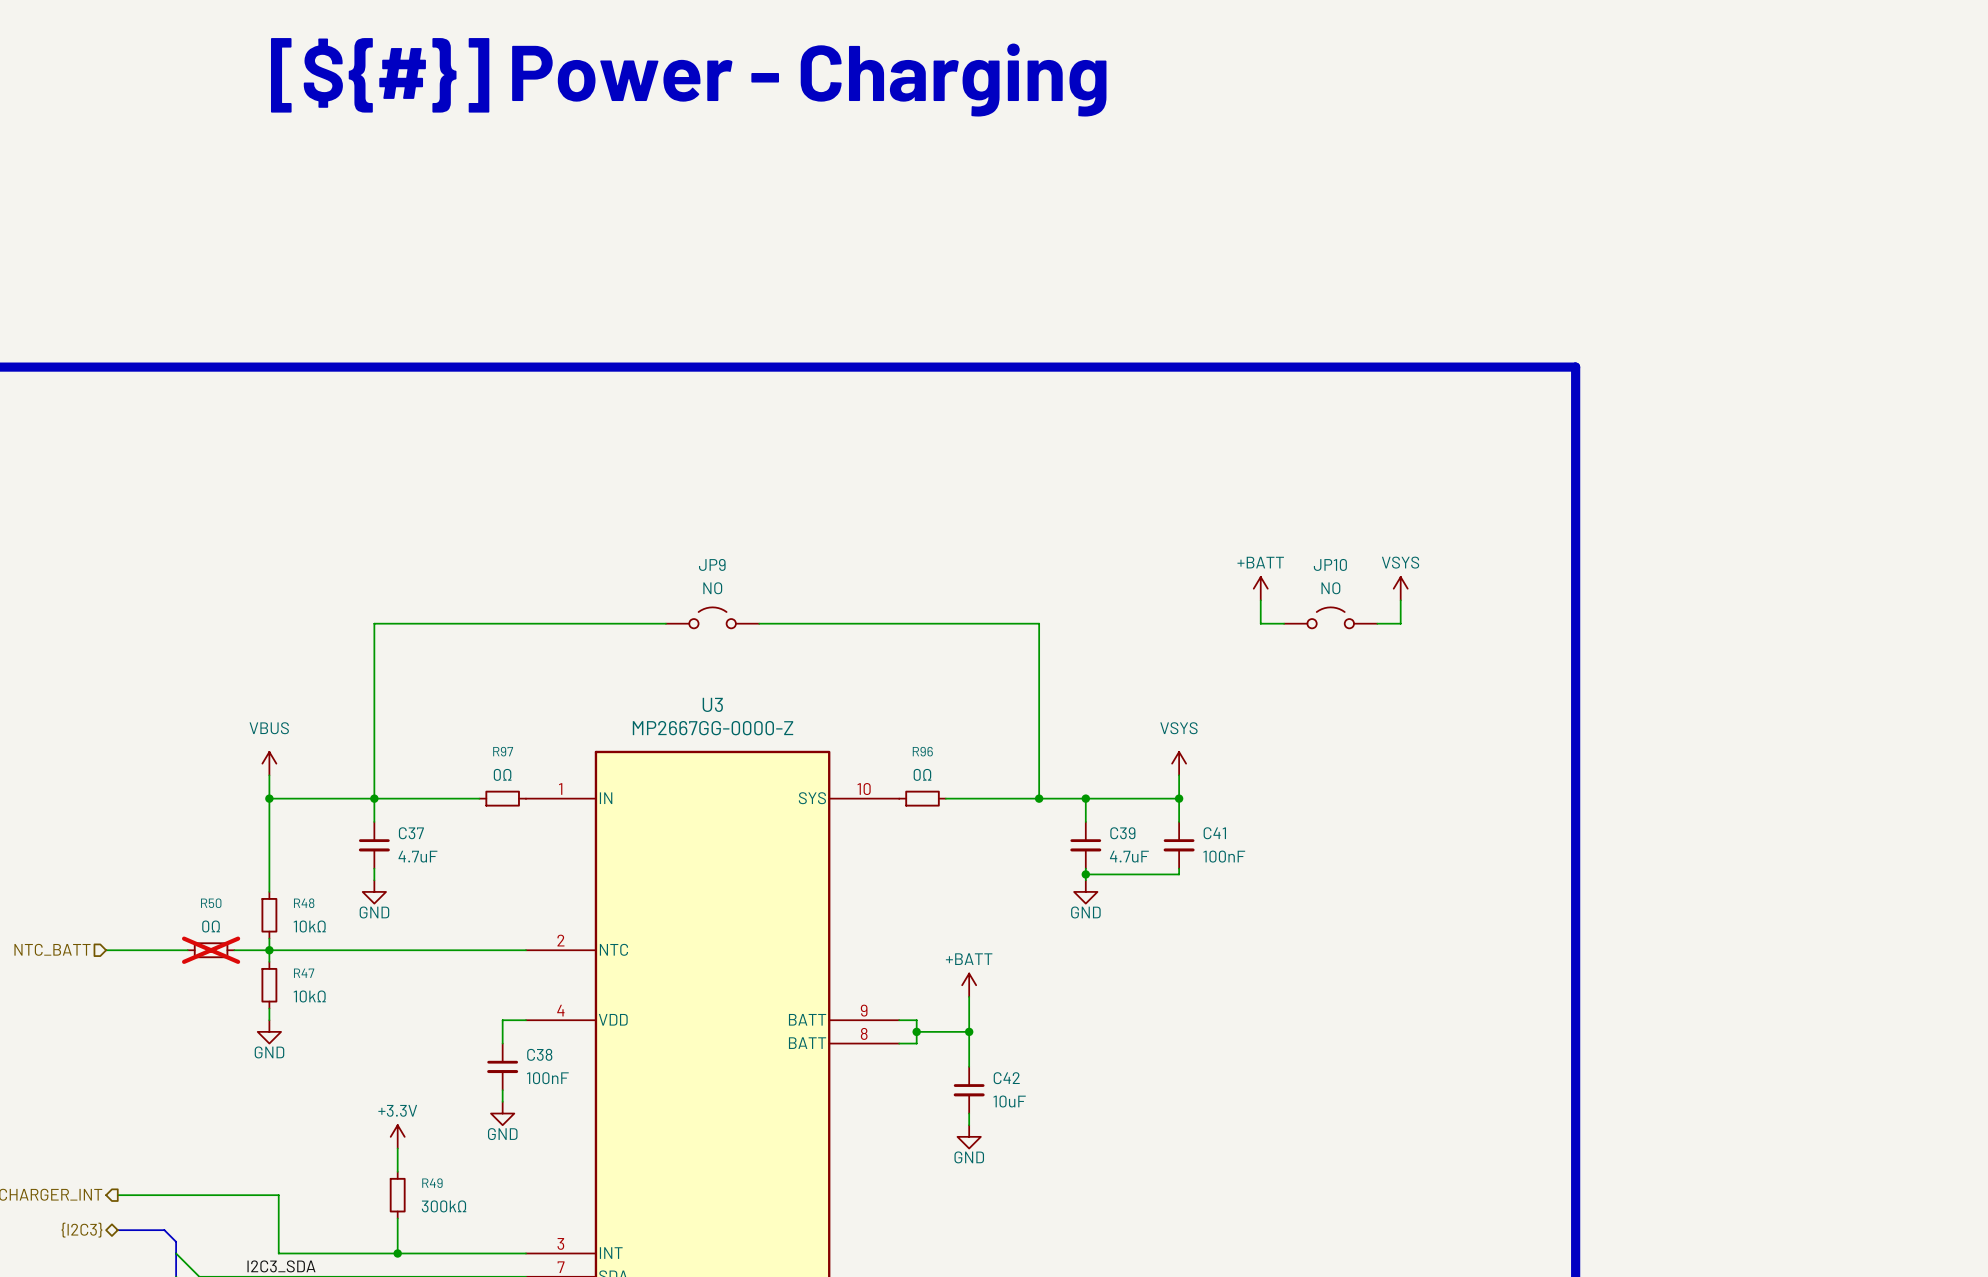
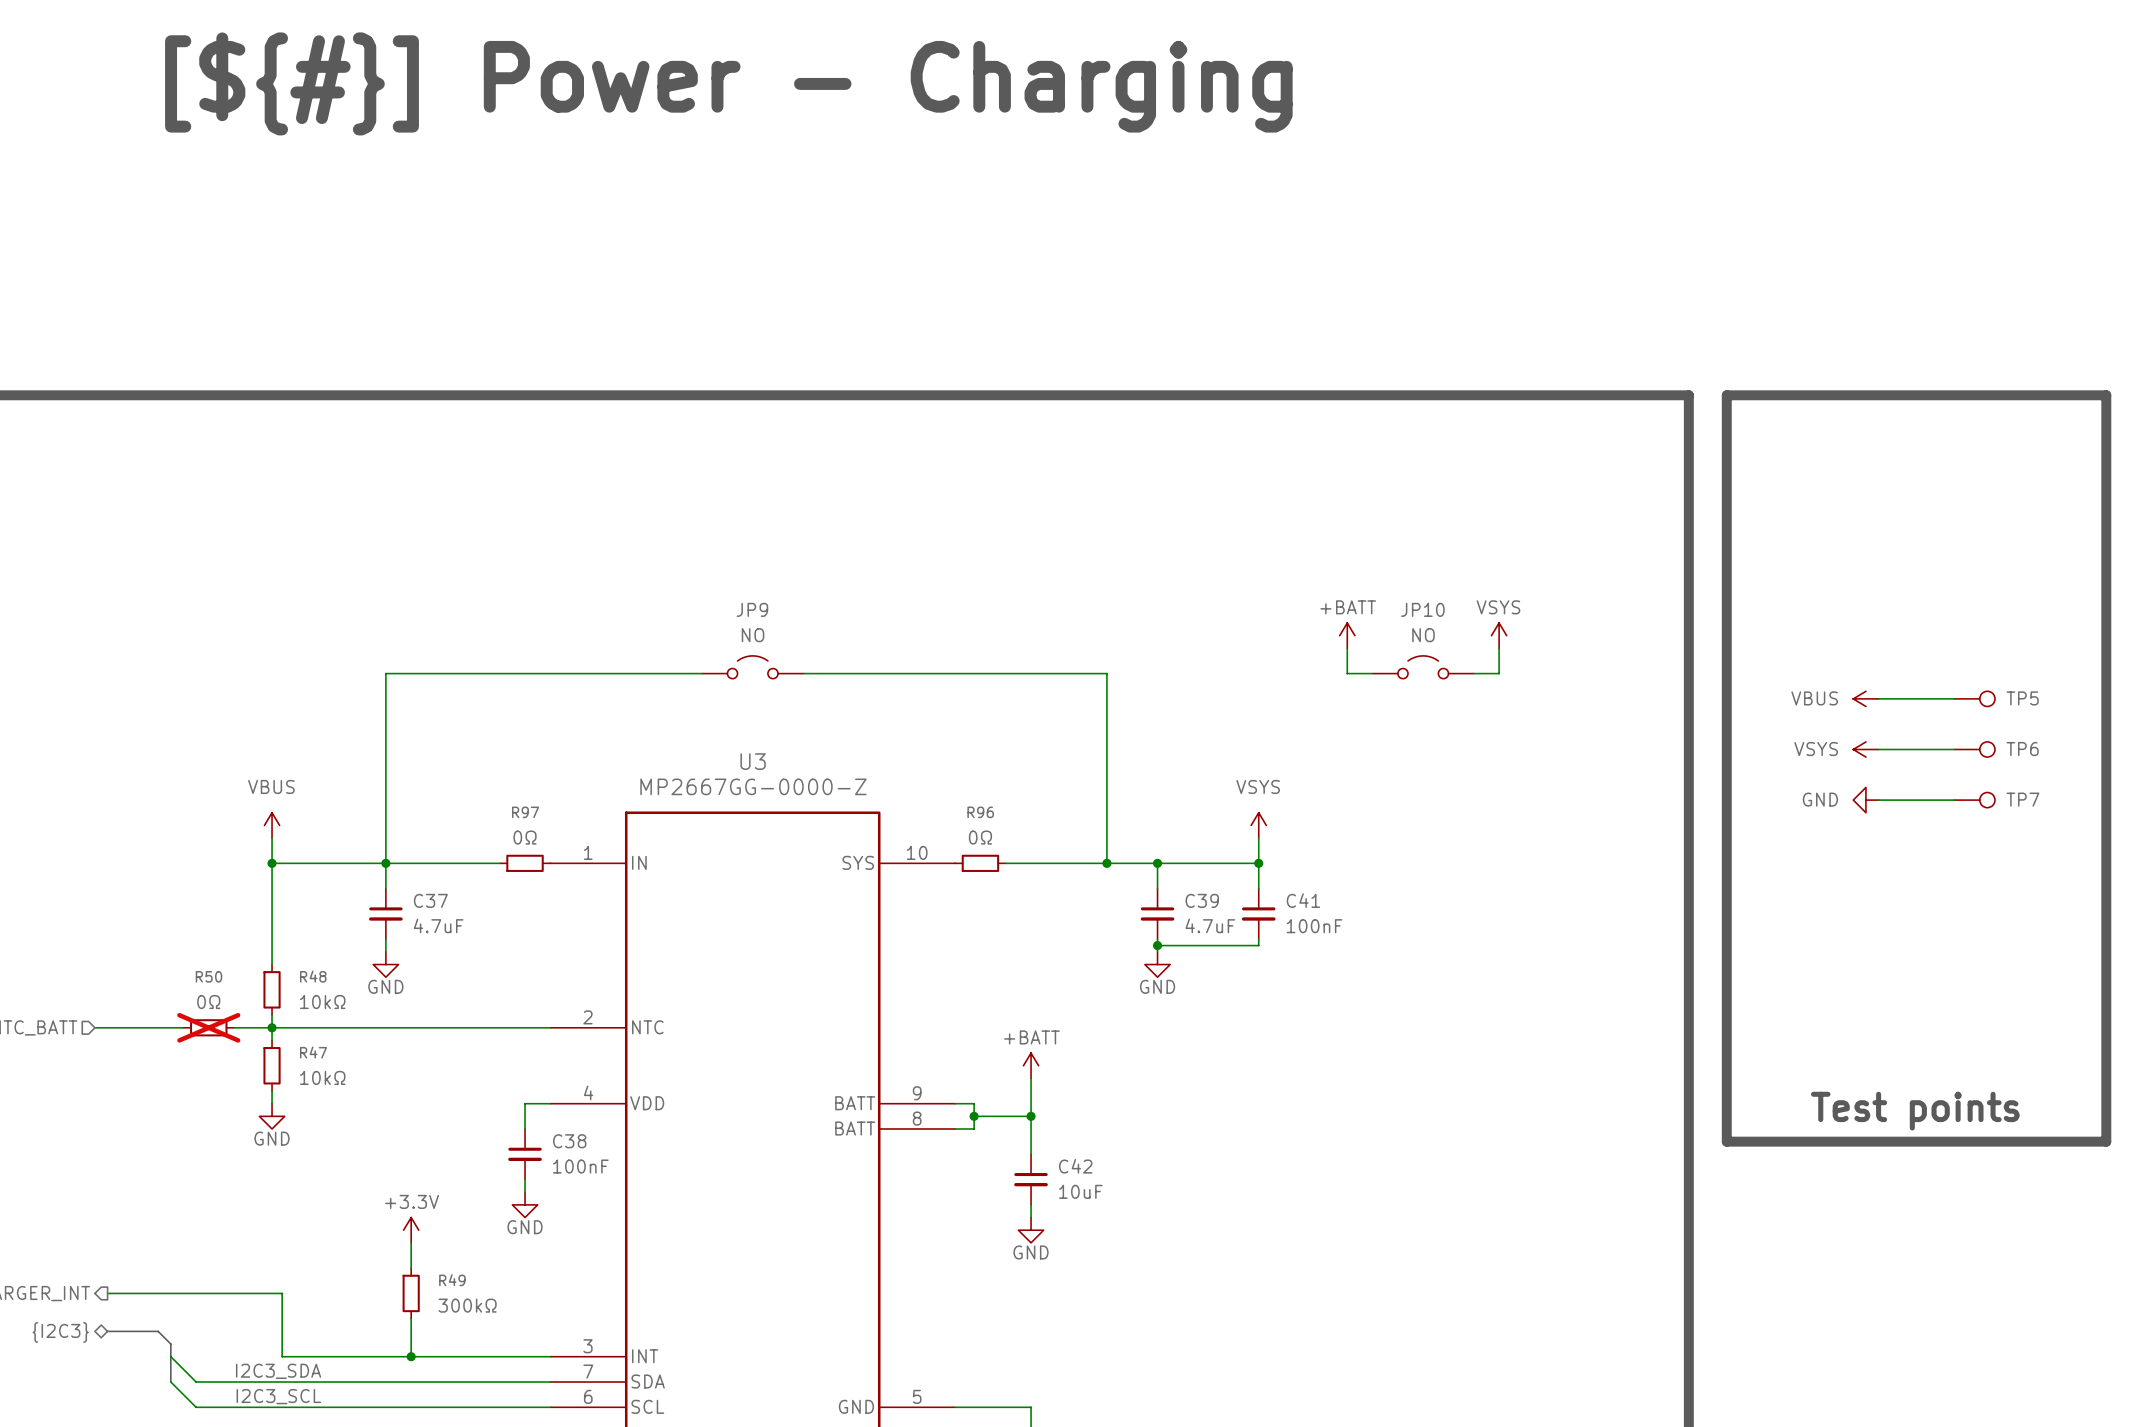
line: none -> (1726, 395) (2106, 395) (2106, 1141) (1726, 1141) (1726, 395)
power symbol: none -> VBUS (1865, 698)
wire: none -> (1878, 698) (1954, 698)
TP5: none -> (1974, 698)
power symbol: none -> VSYS (1865, 749)
wire: none -> (1878, 749) (1954, 749)
TP6: none -> (1974, 749)
power symbol: none -> GND (1865, 800)
wire: none -> (1878, 800) (1954, 800)
TP7: none -> (1974, 800)
text: none -> Test points (1915, 1111)

